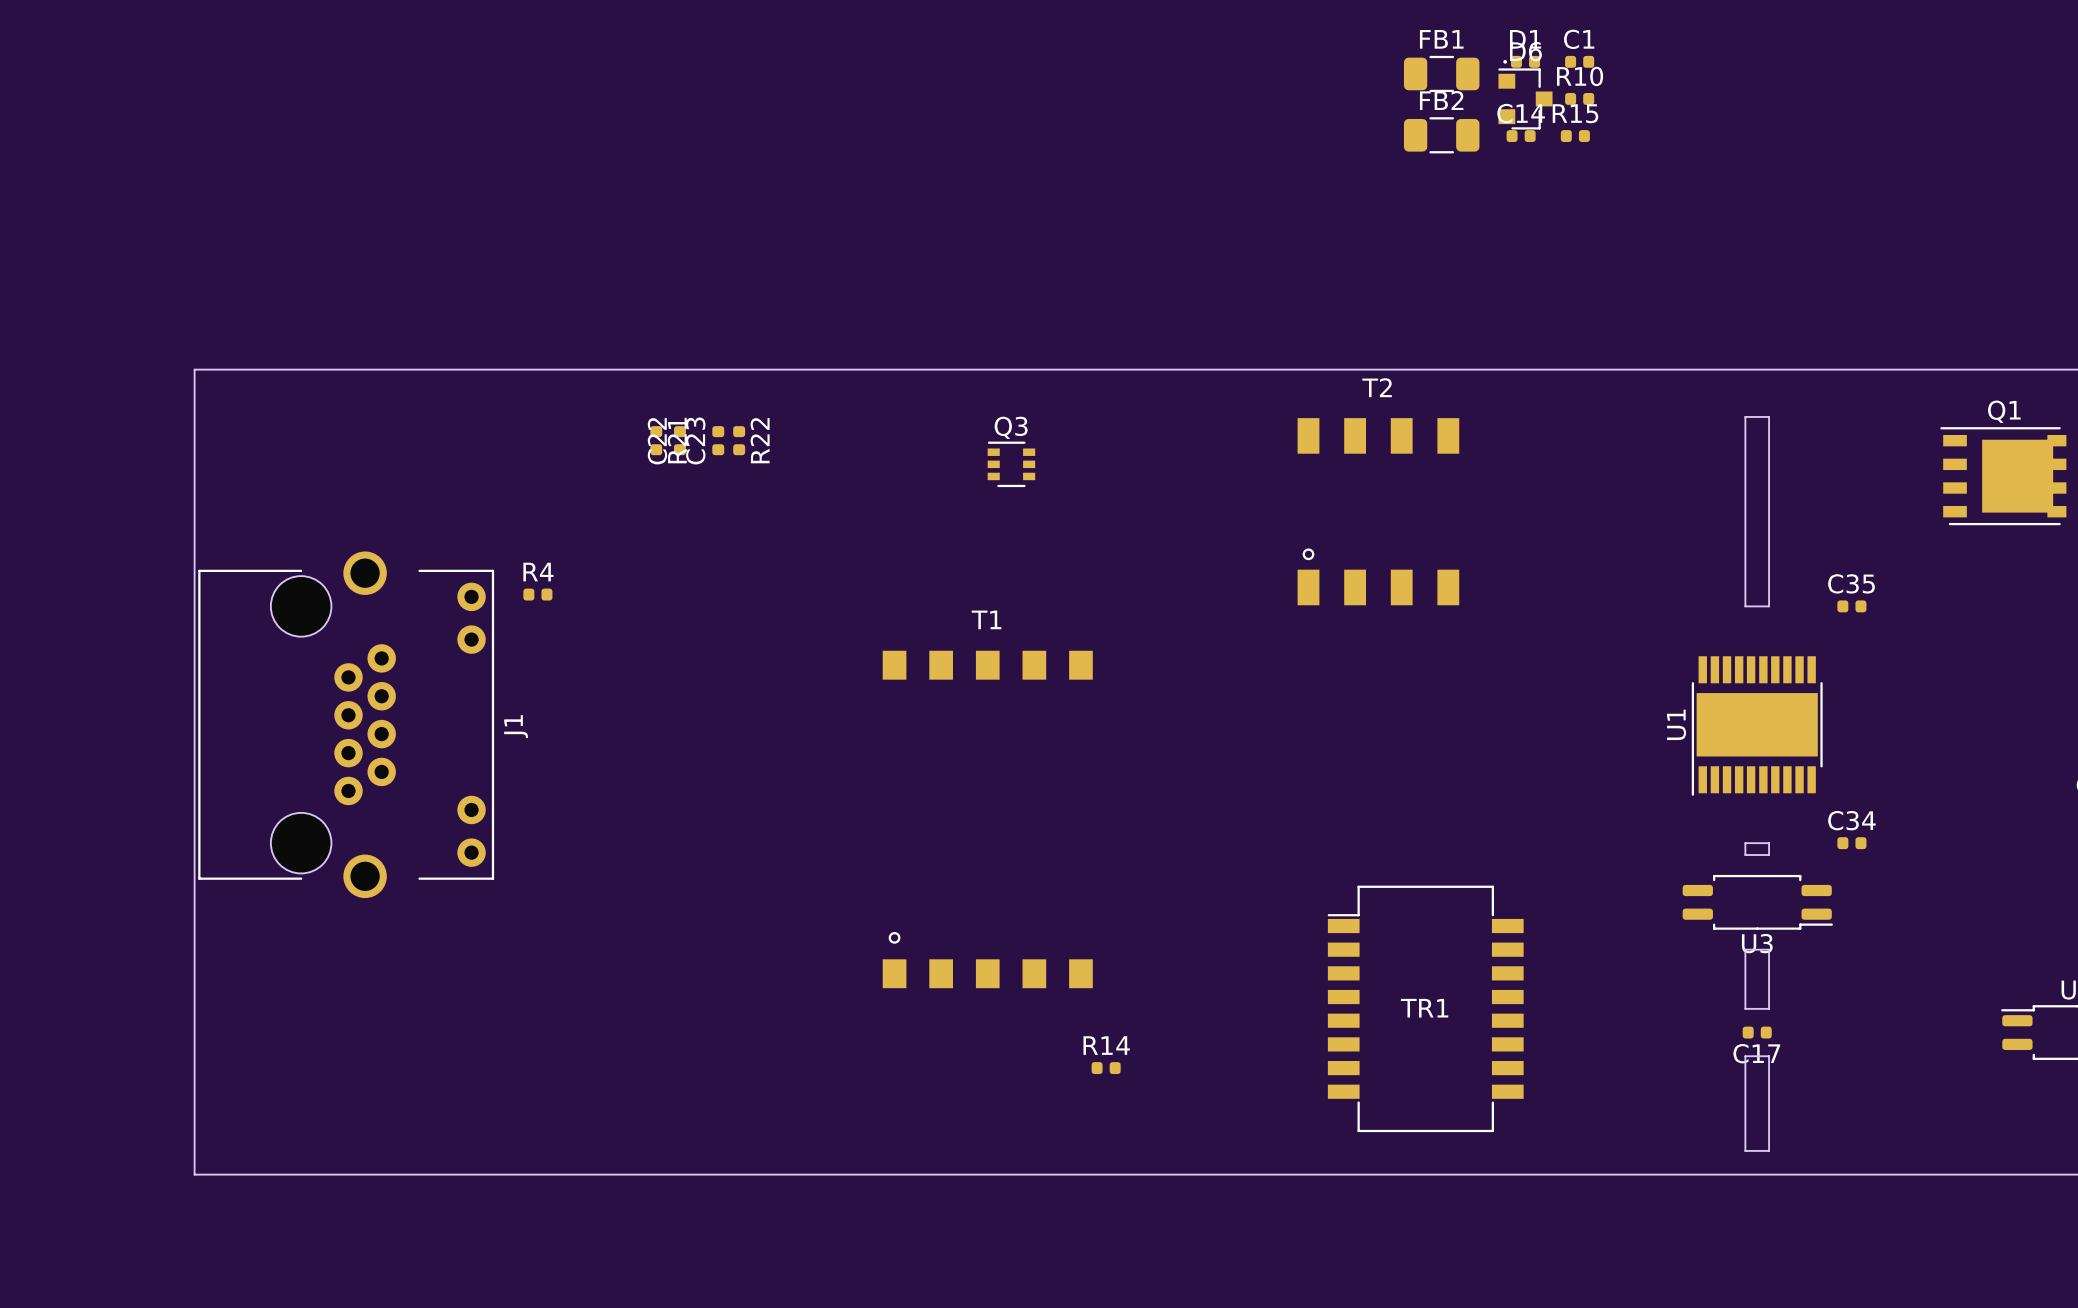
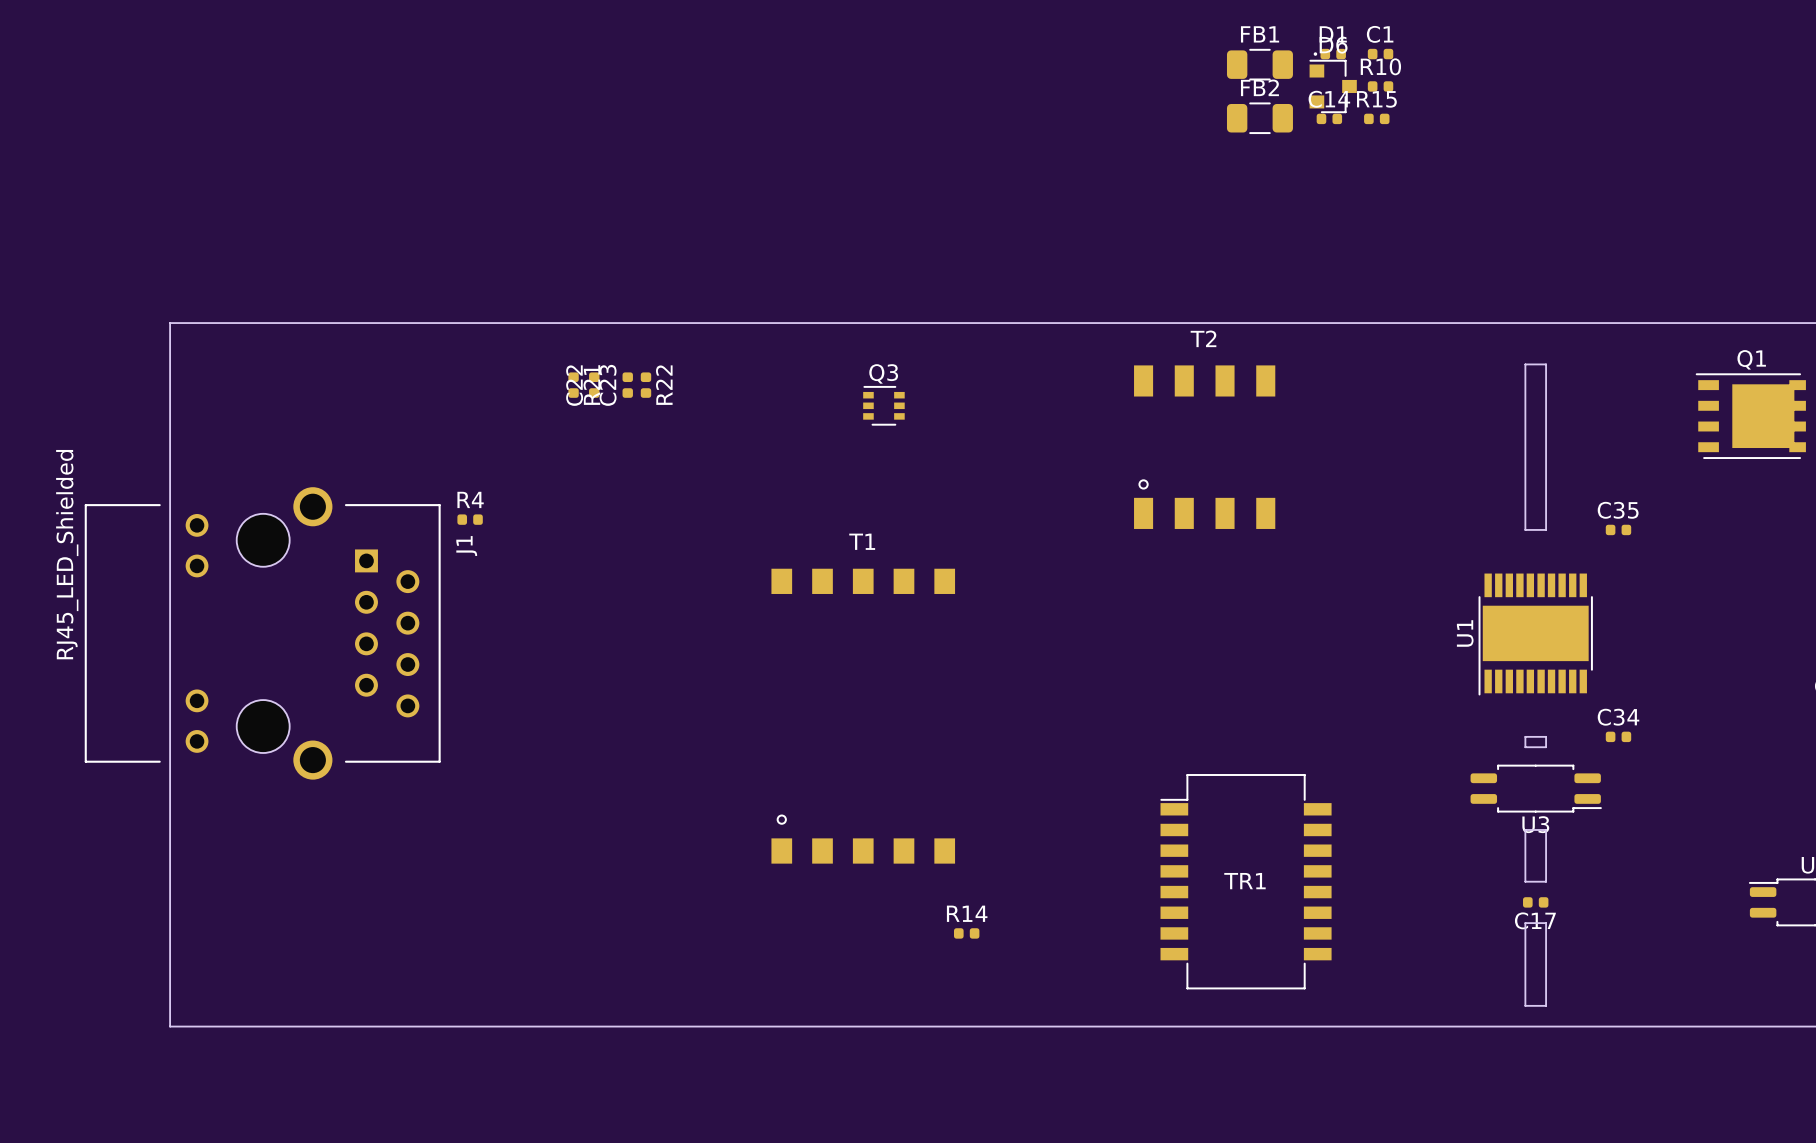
J1 footprint: [198, 551, 495, 899] -> [84, 487, 441, 780]
J1 value: none -> RJ45_LED_Shielded (67, 554)
J1 name position: J1 (516, 726) -> J1 (466, 546)

